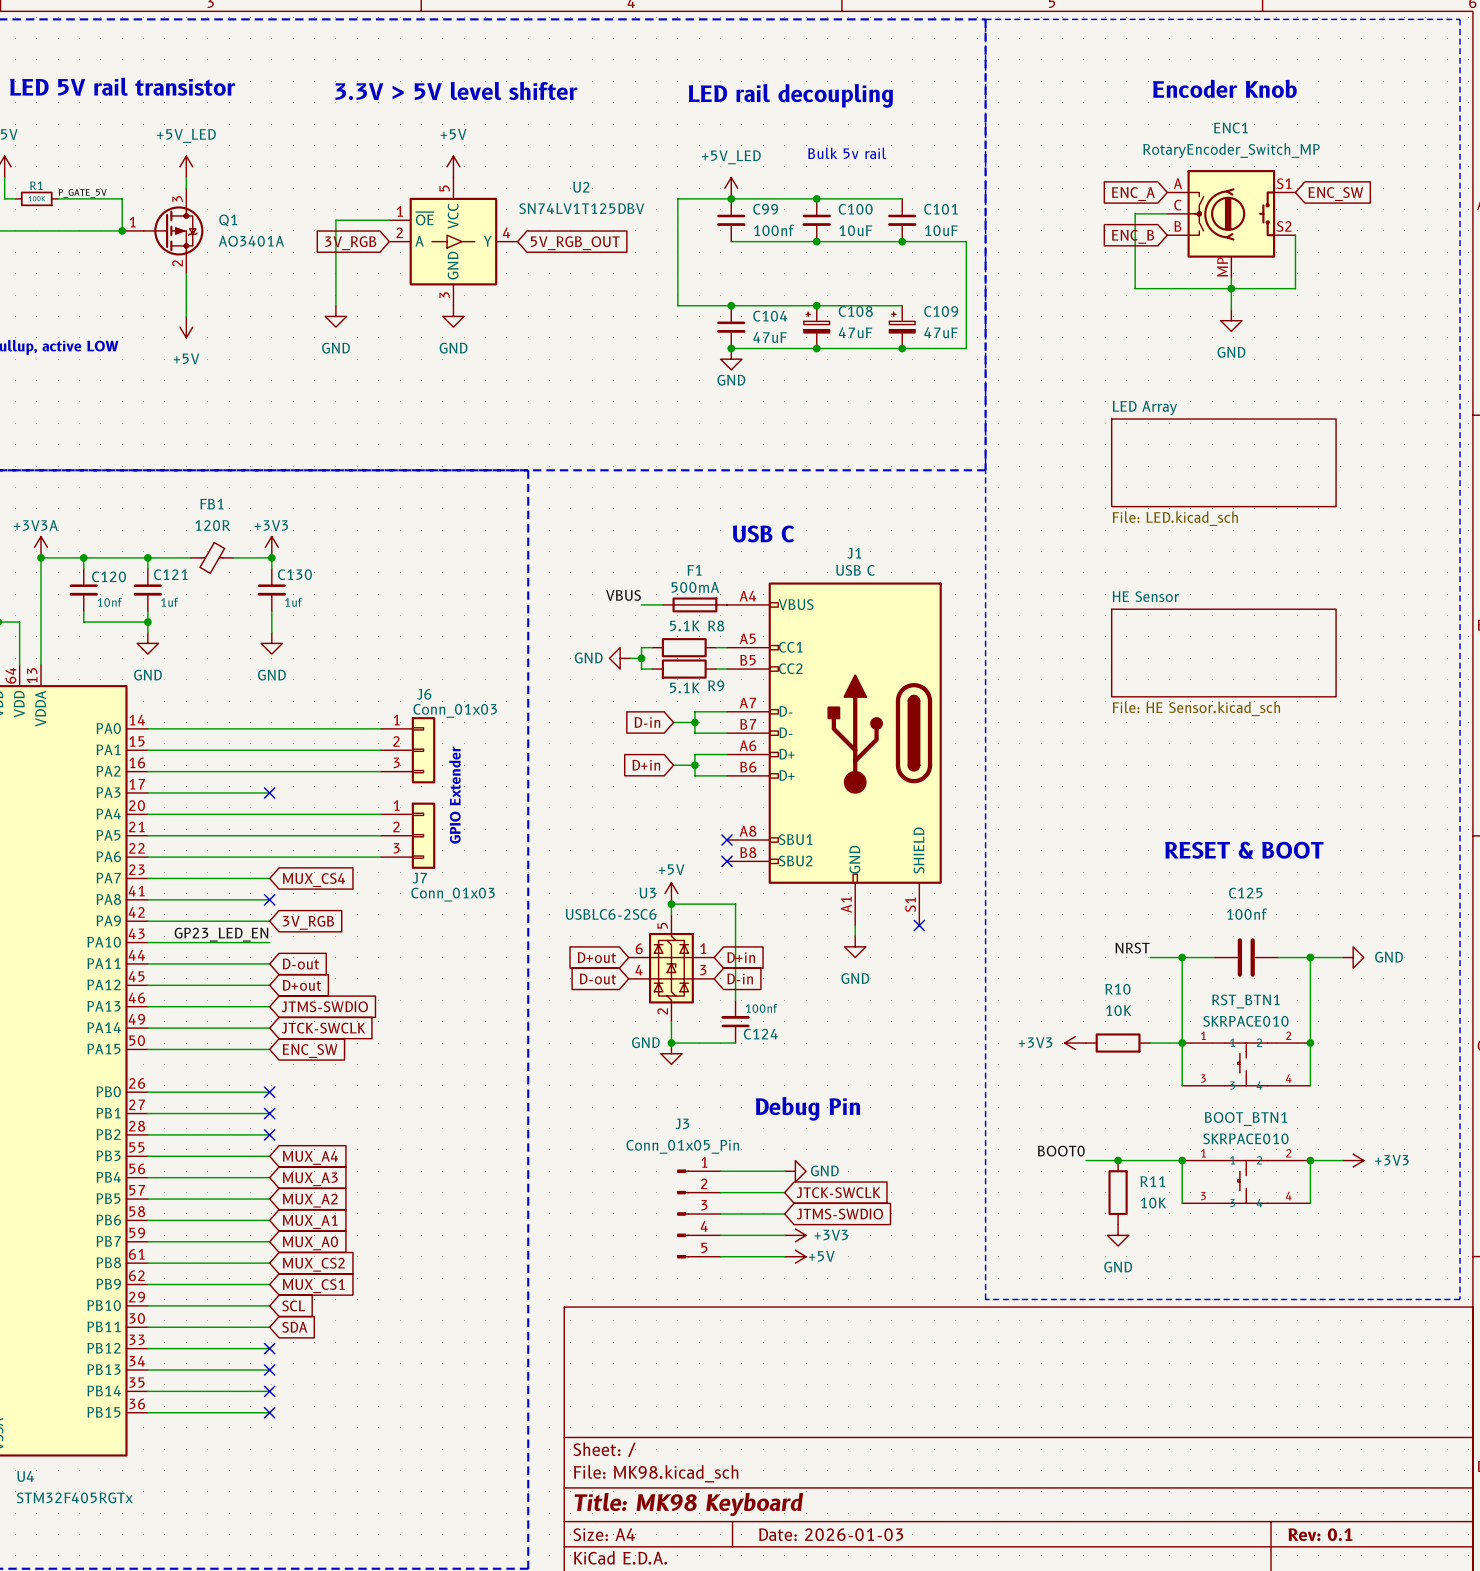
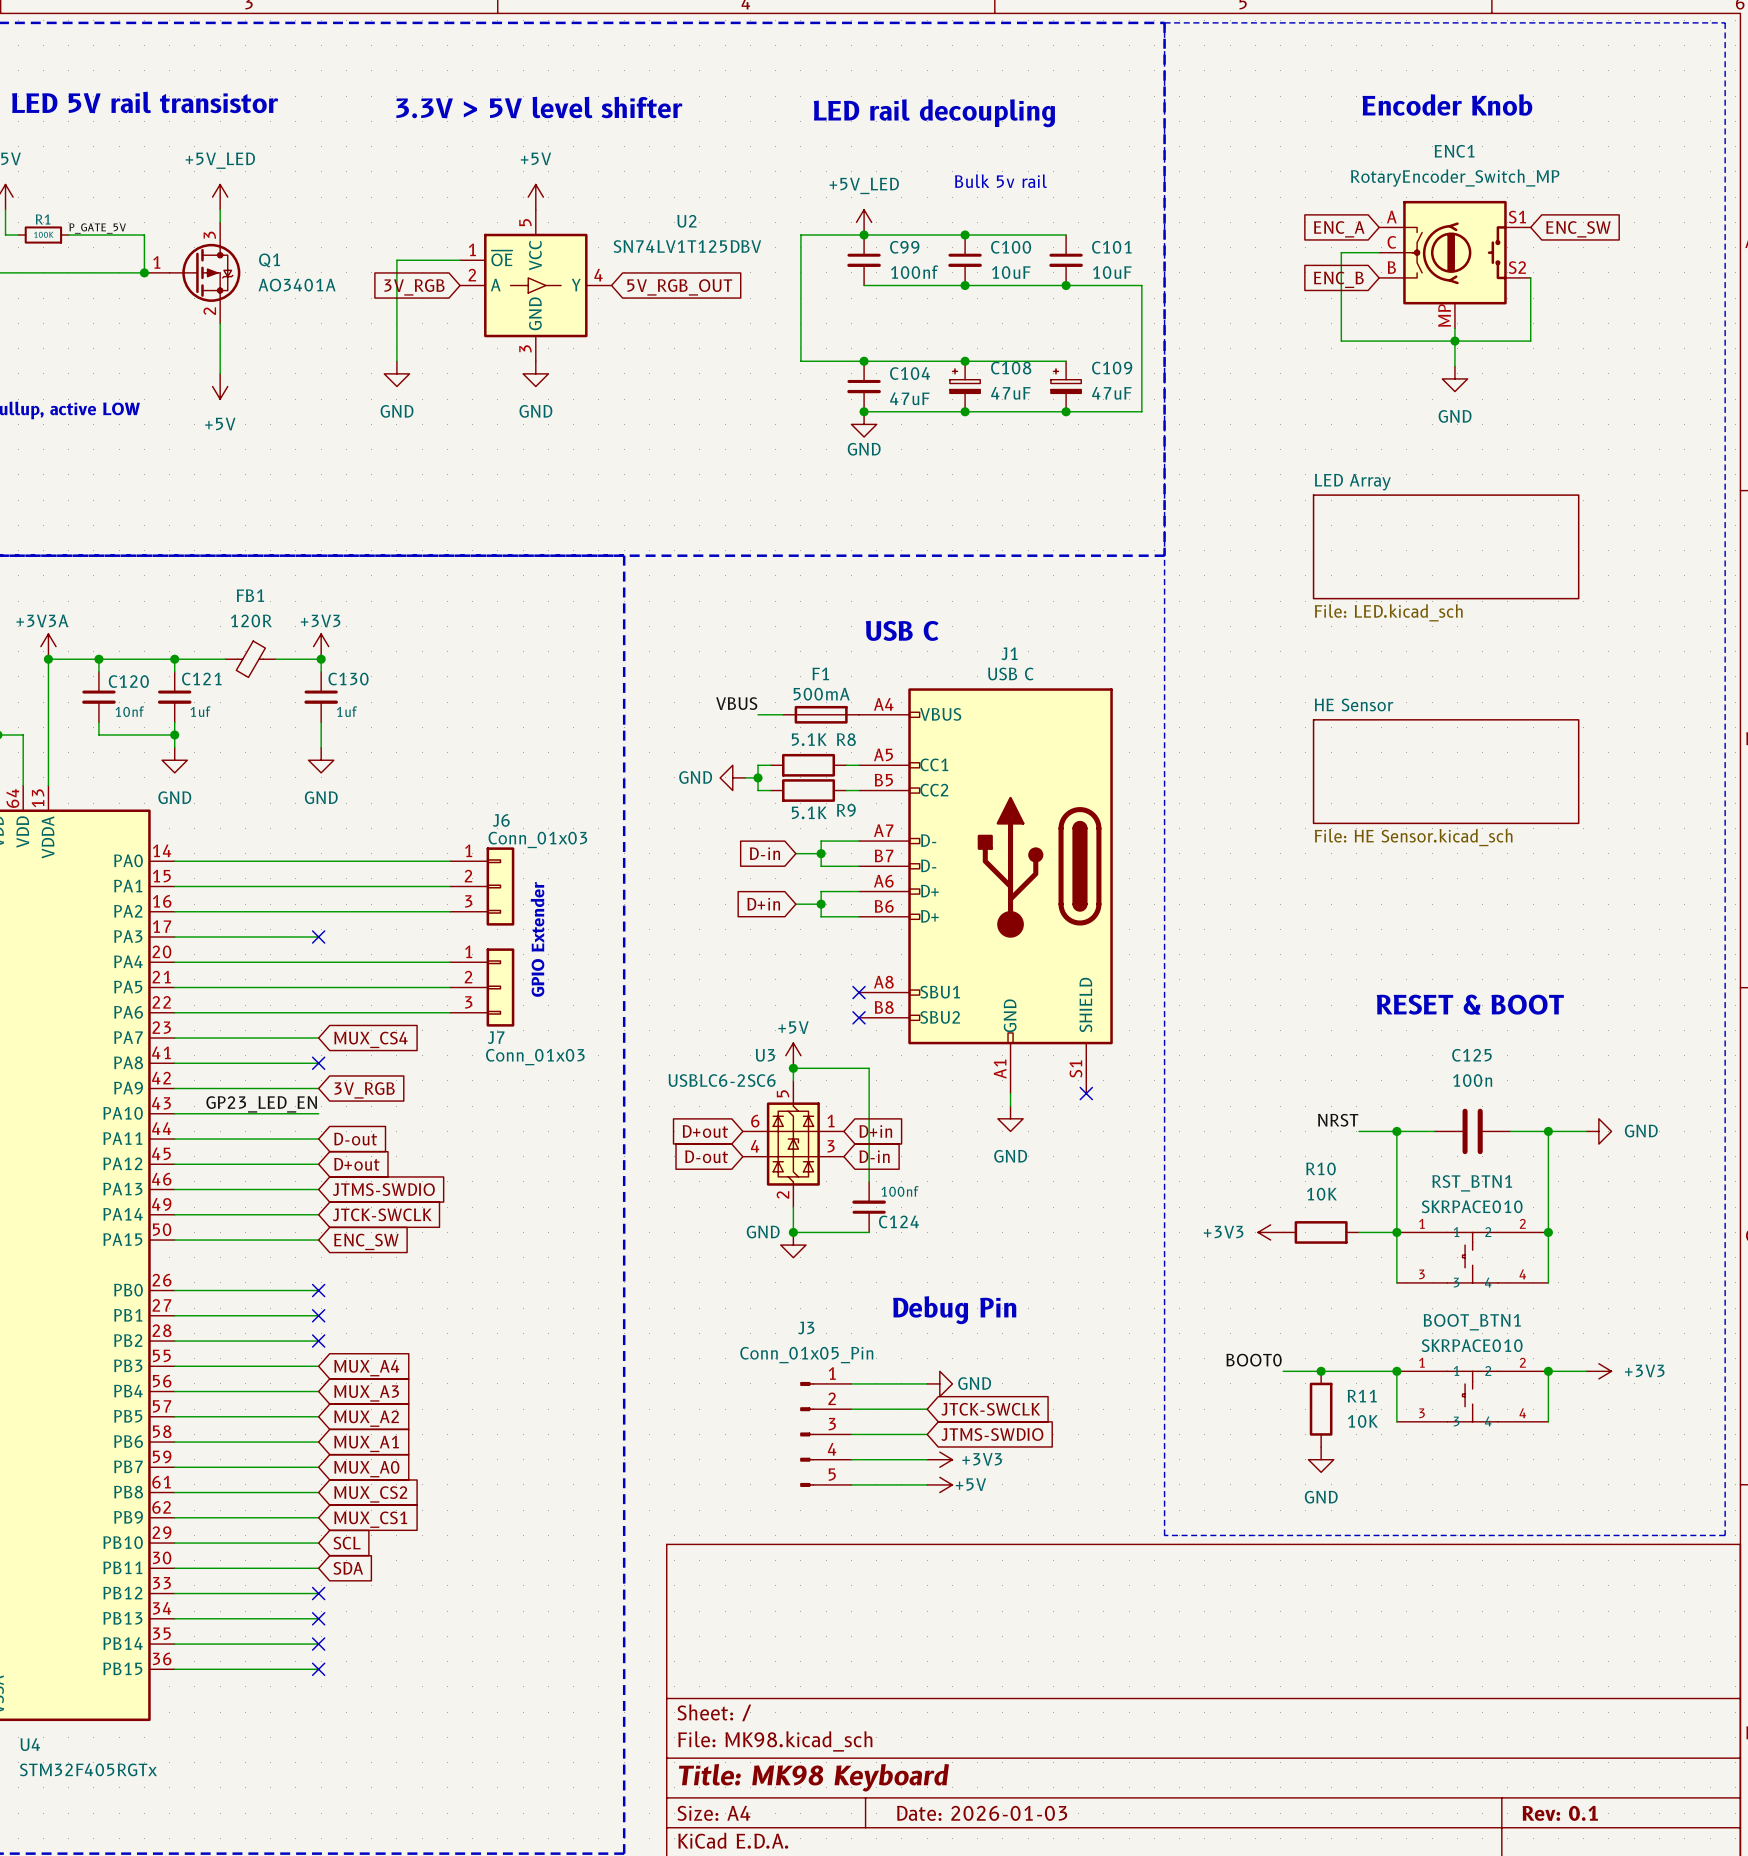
C125 value: 100nf (1246, 914) -> 100n (1472, 1080)

